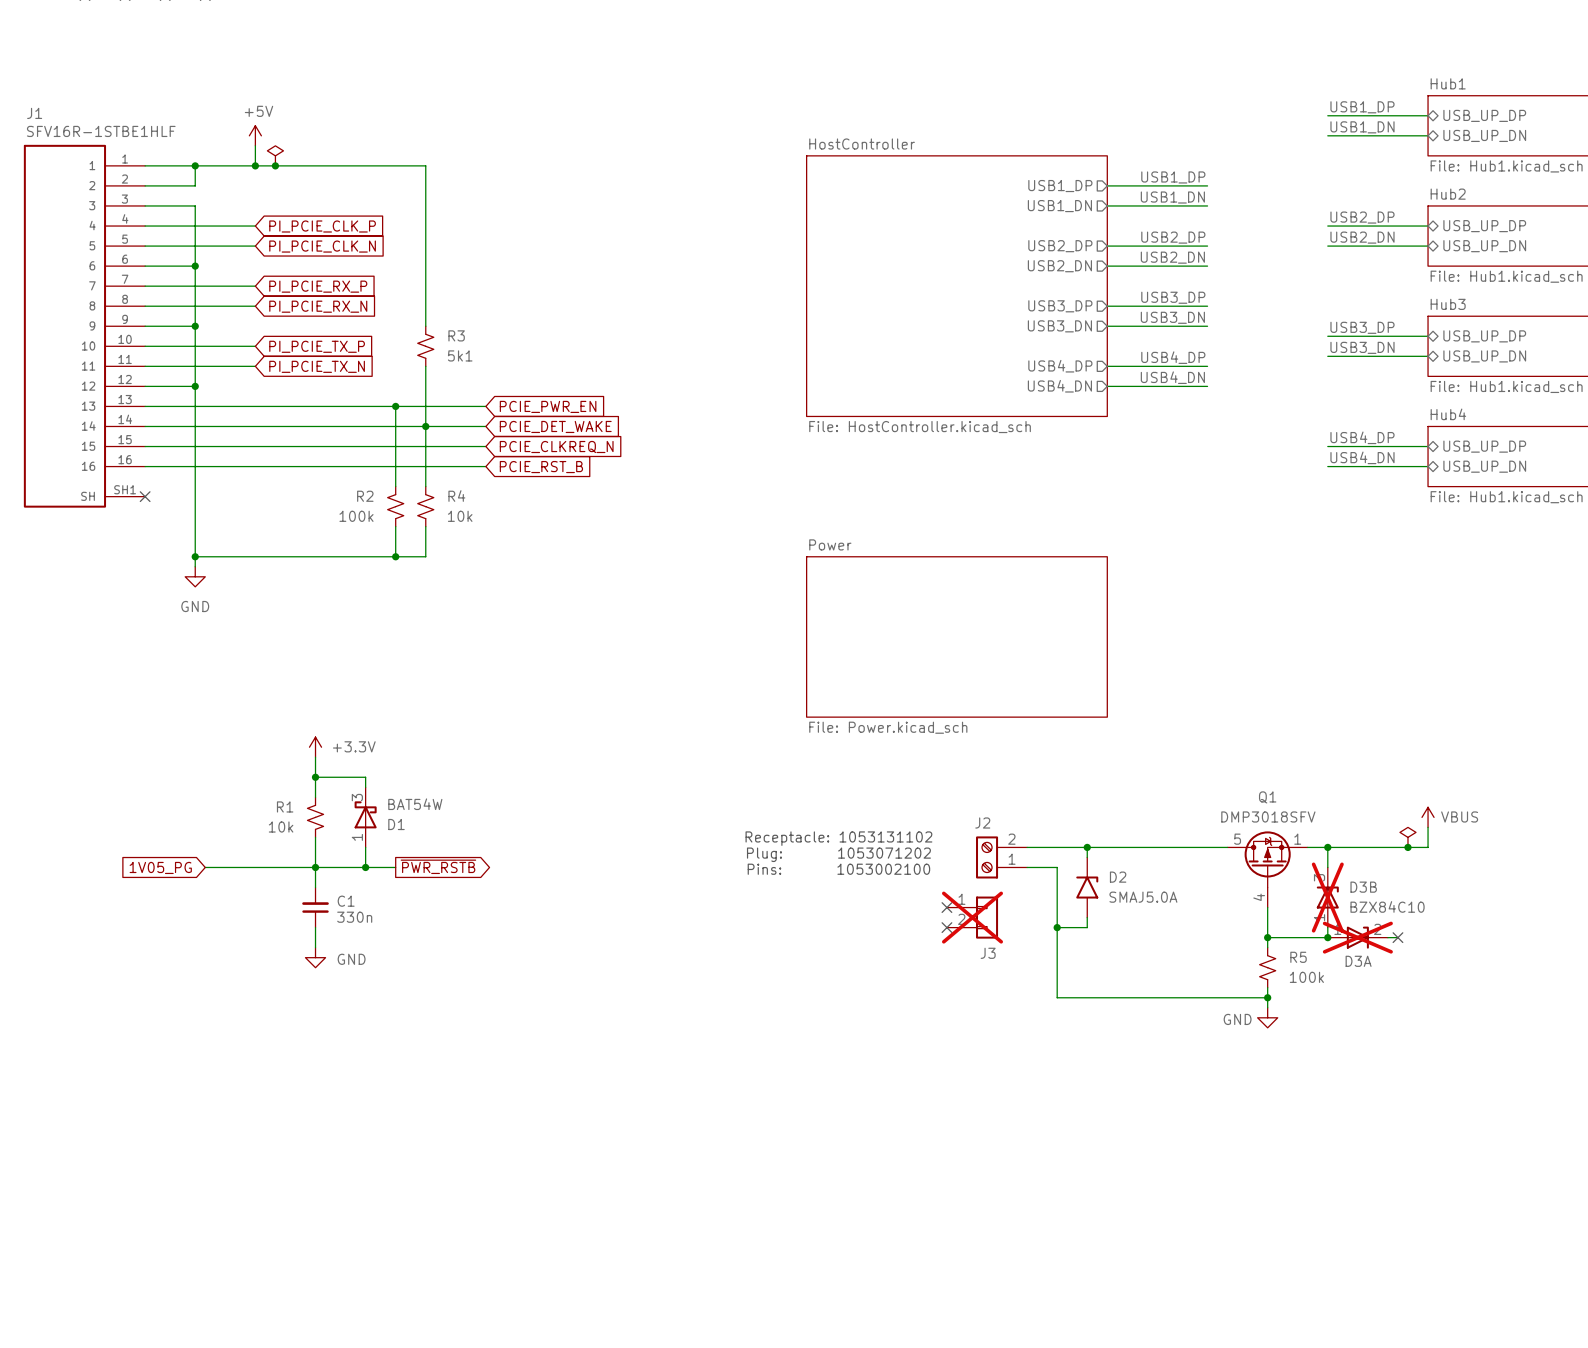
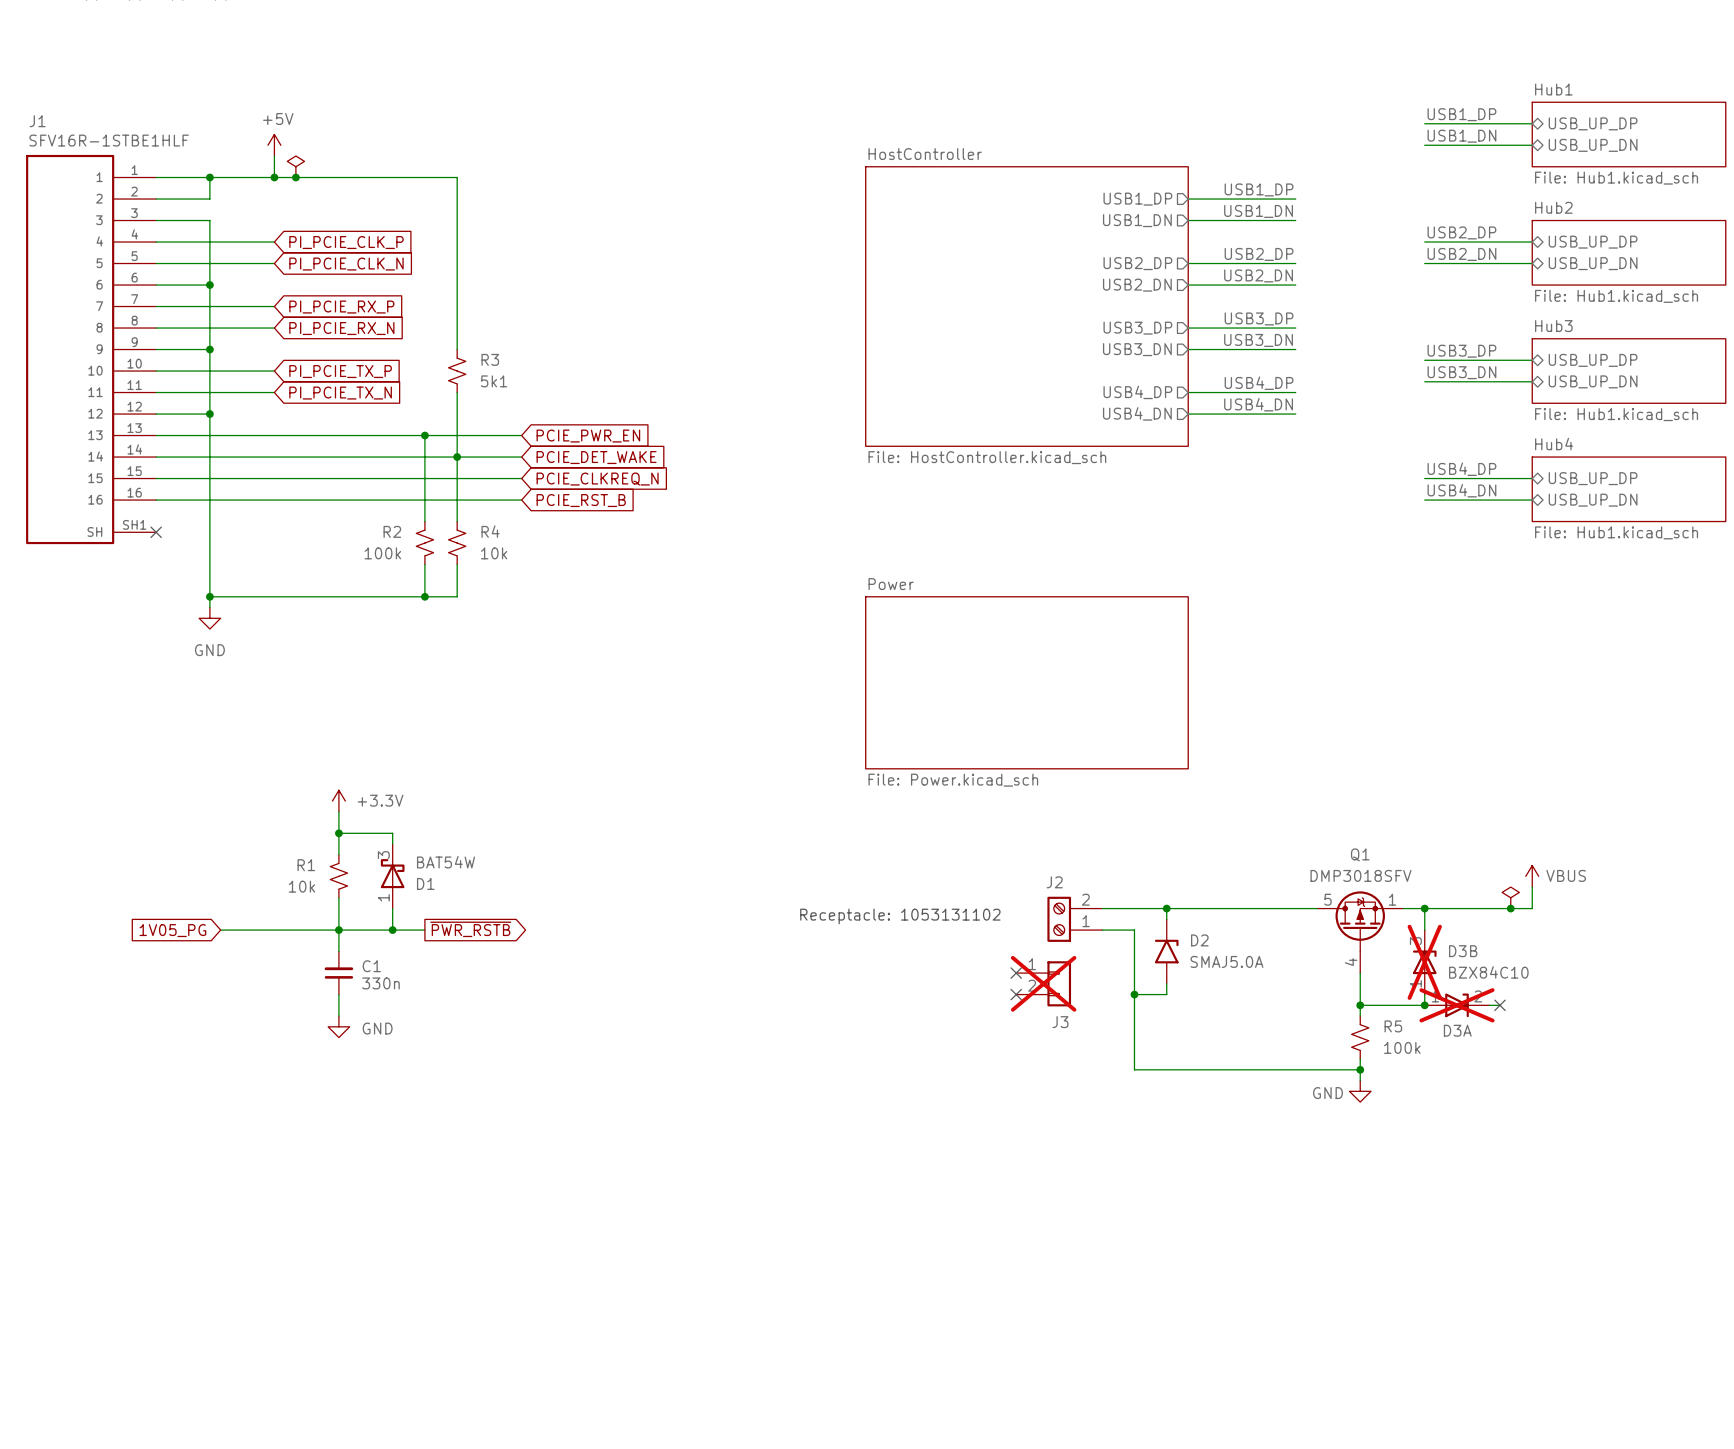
text: Receptacle: 1053131102 (838, 838) -> none
text: Plug: 1053071202 (838, 854) -> Receptacle: 1053131102 (900, 916)
text: Pins: 1053002100 (838, 869) -> none

